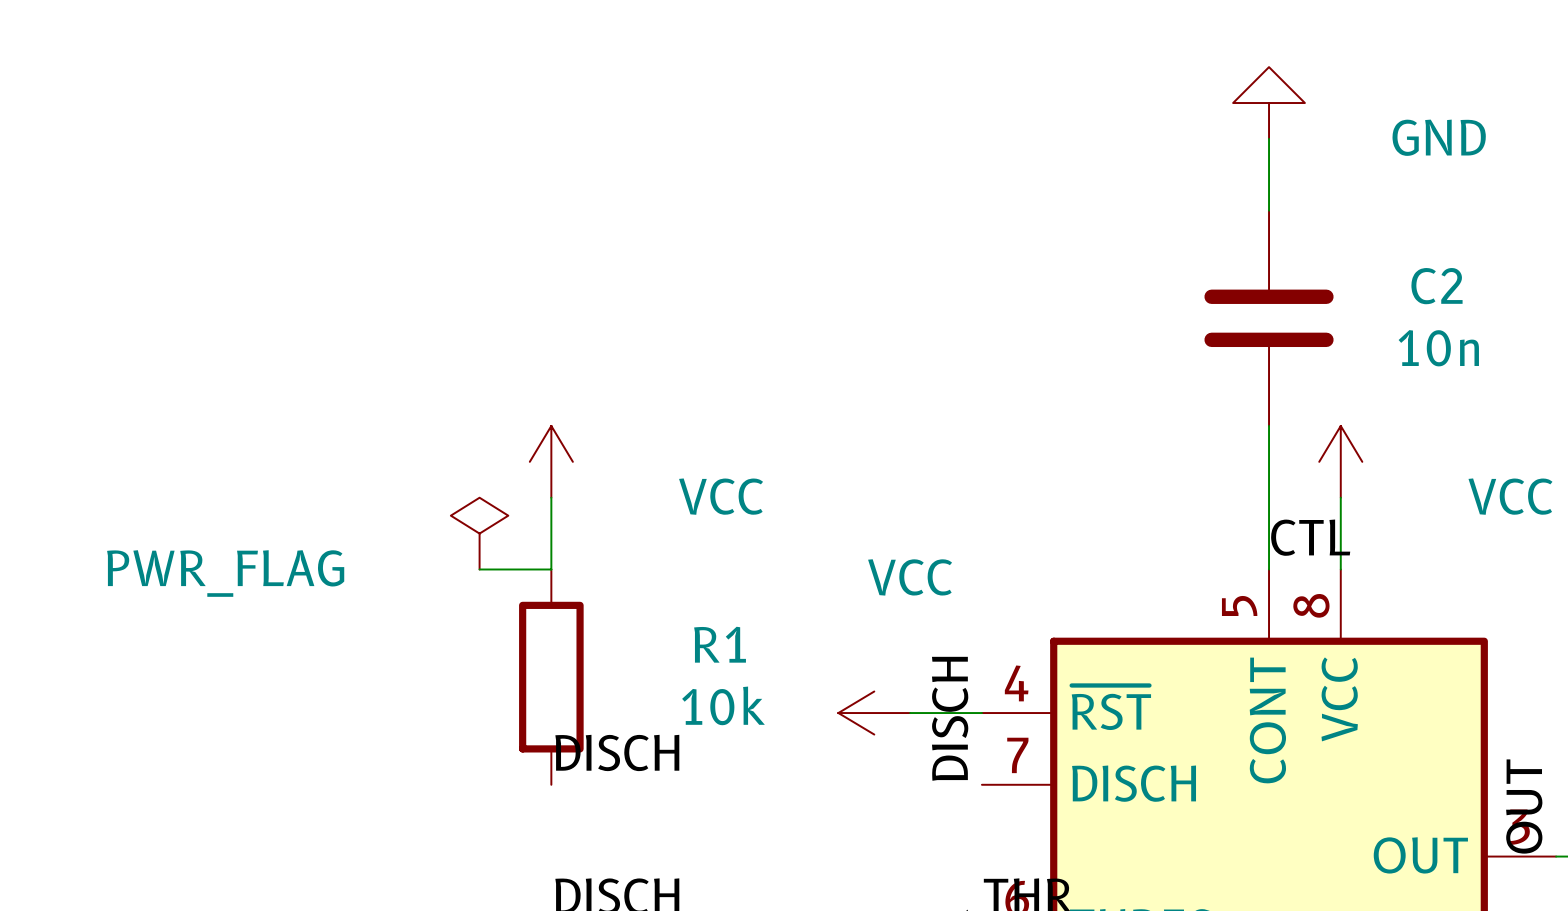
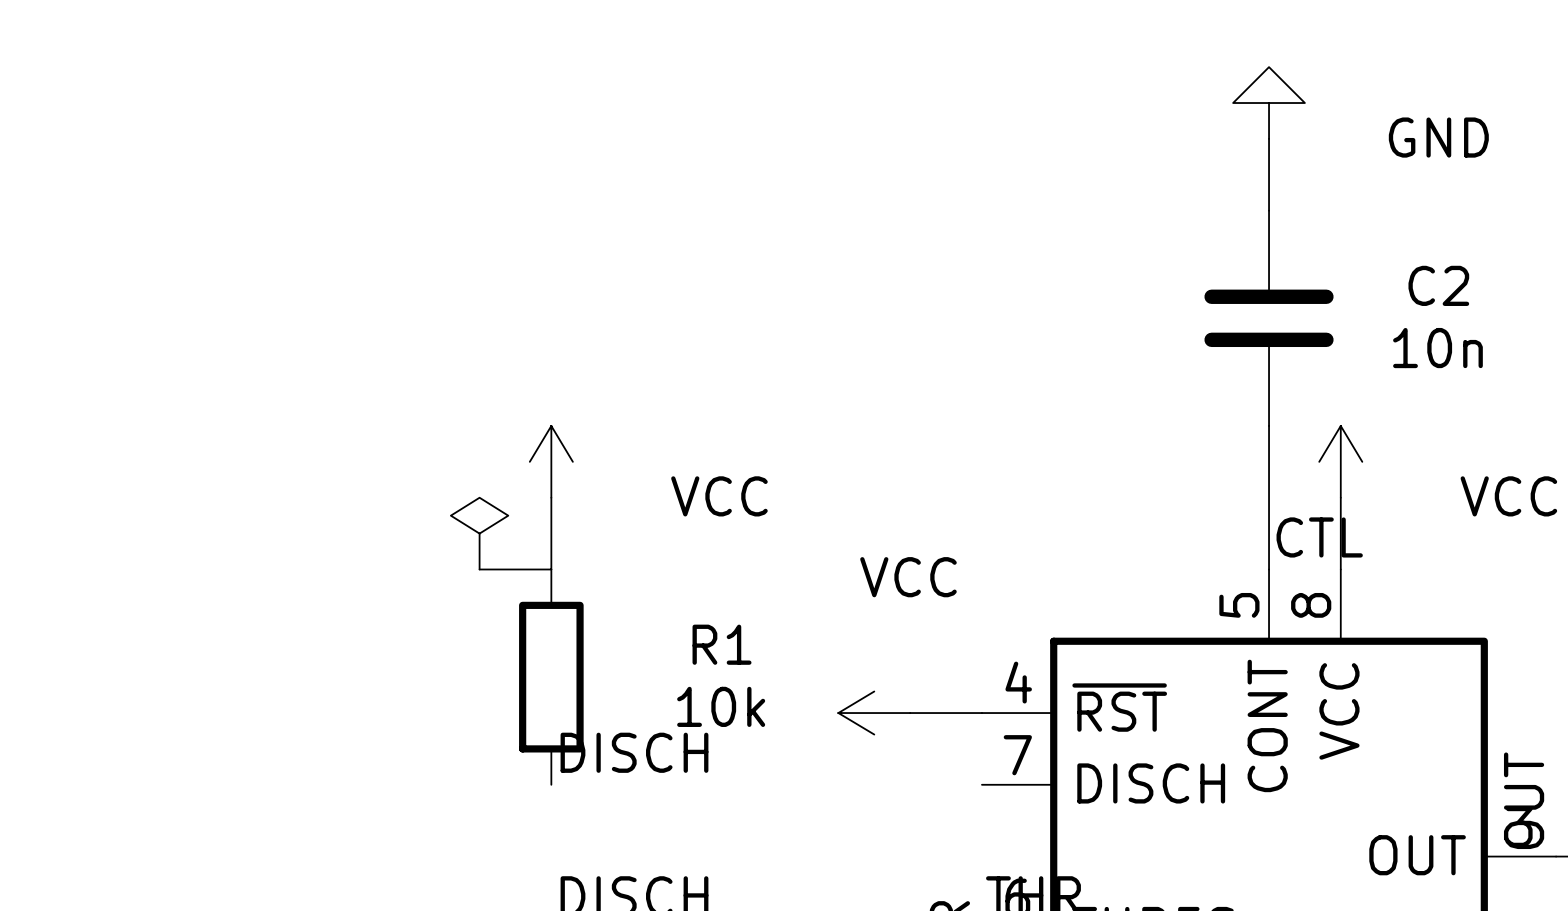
power symbol text: PWR_FLAG (225, 573) -> none
label: DISCH (950, 718) -> none

